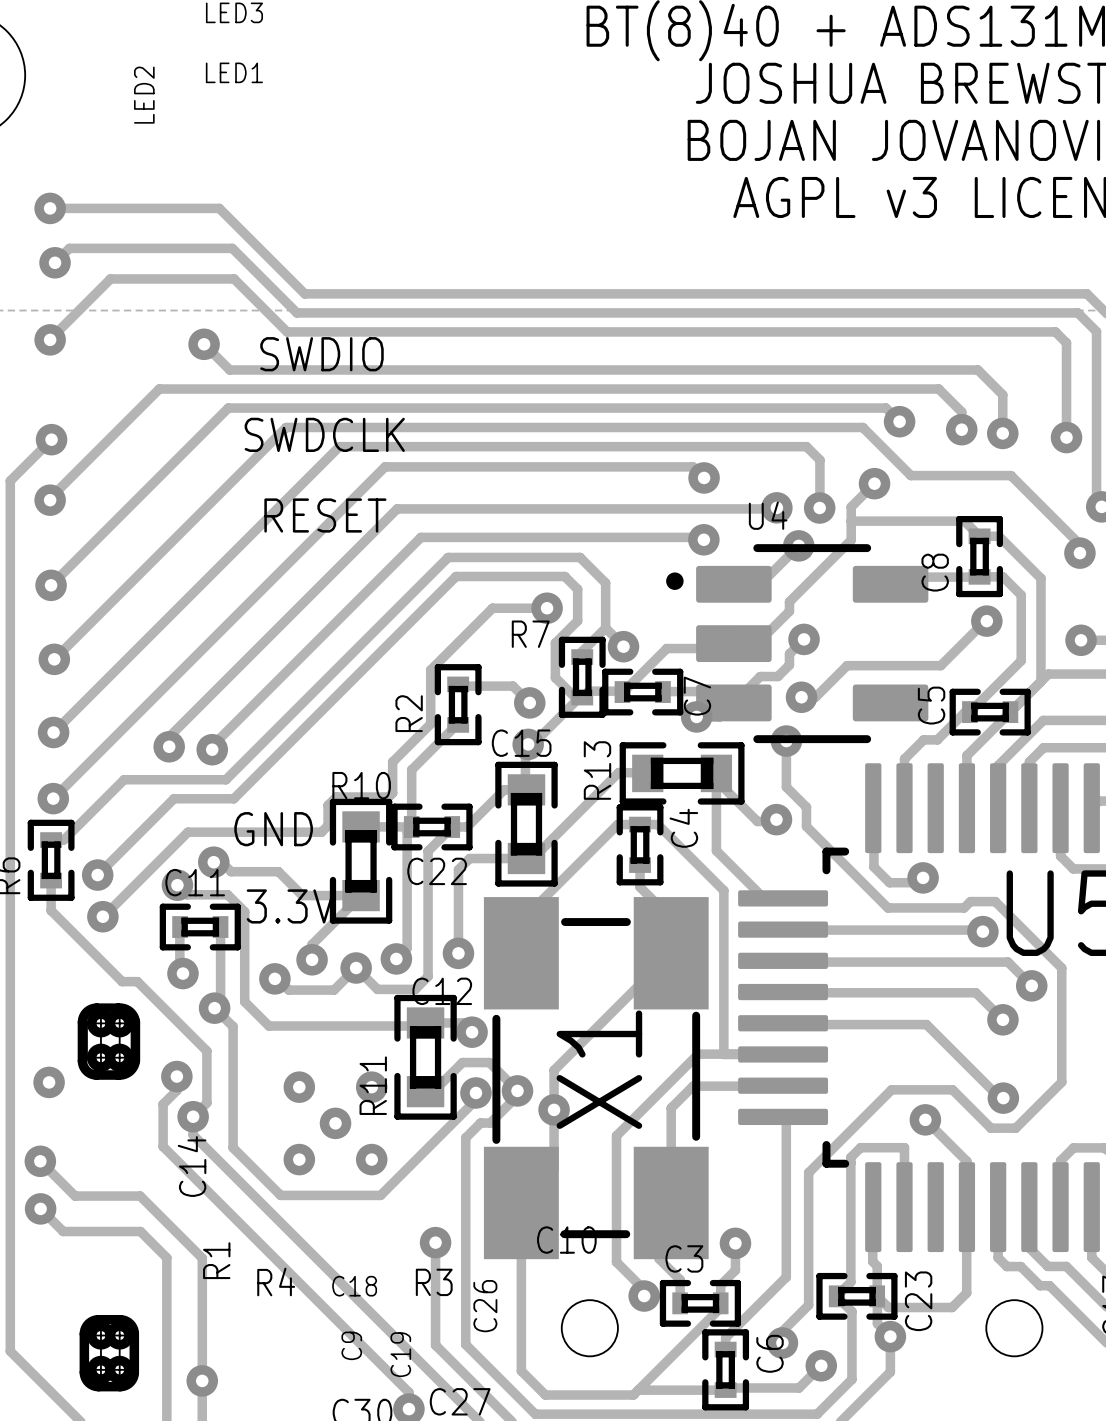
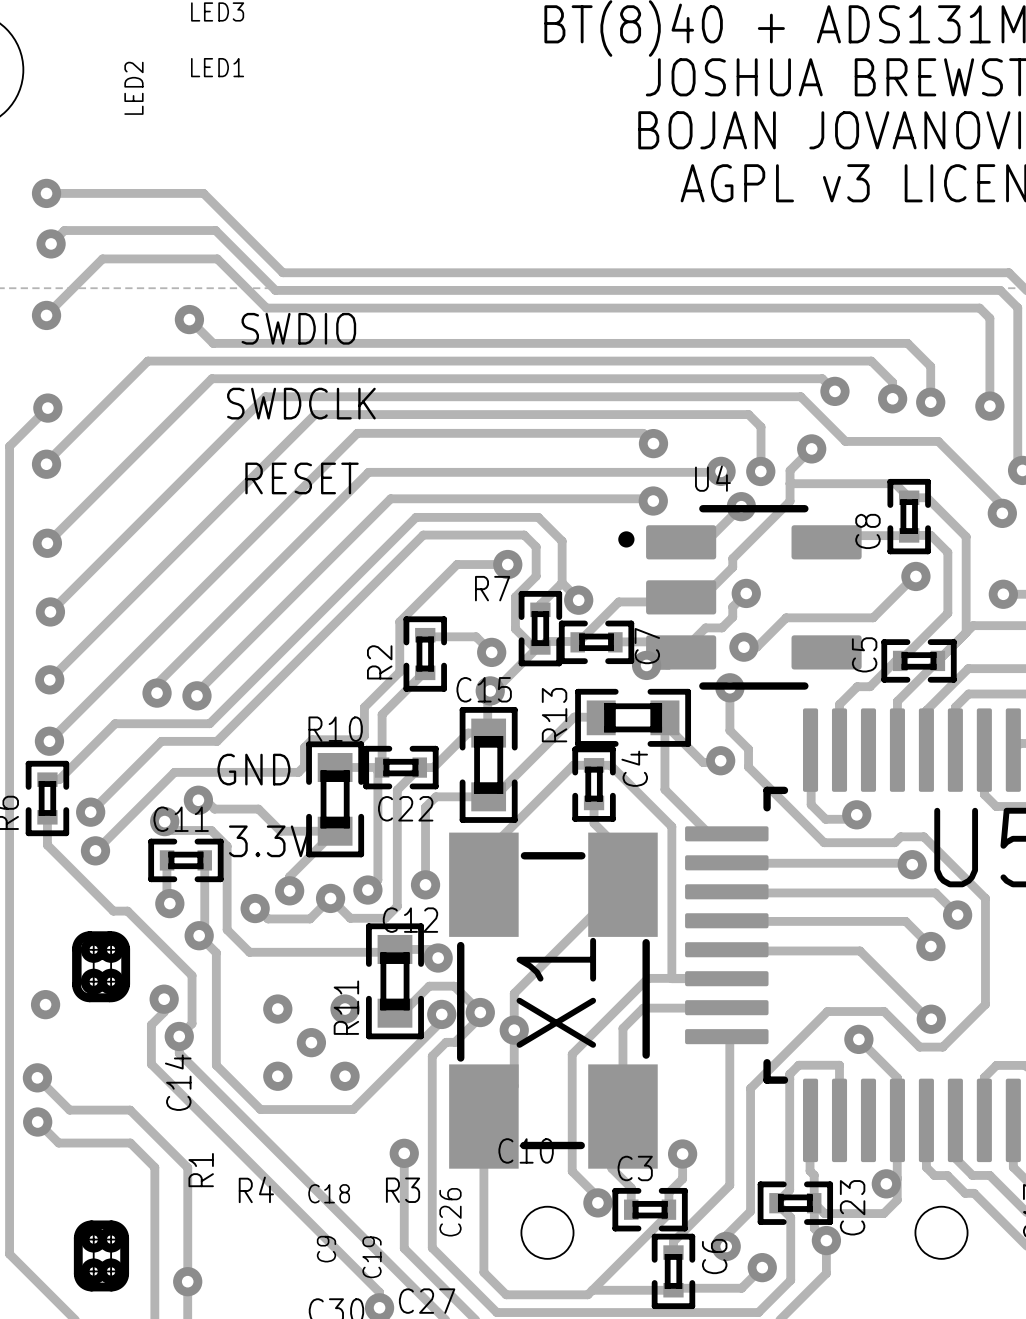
via: none -> (886, 1183)

